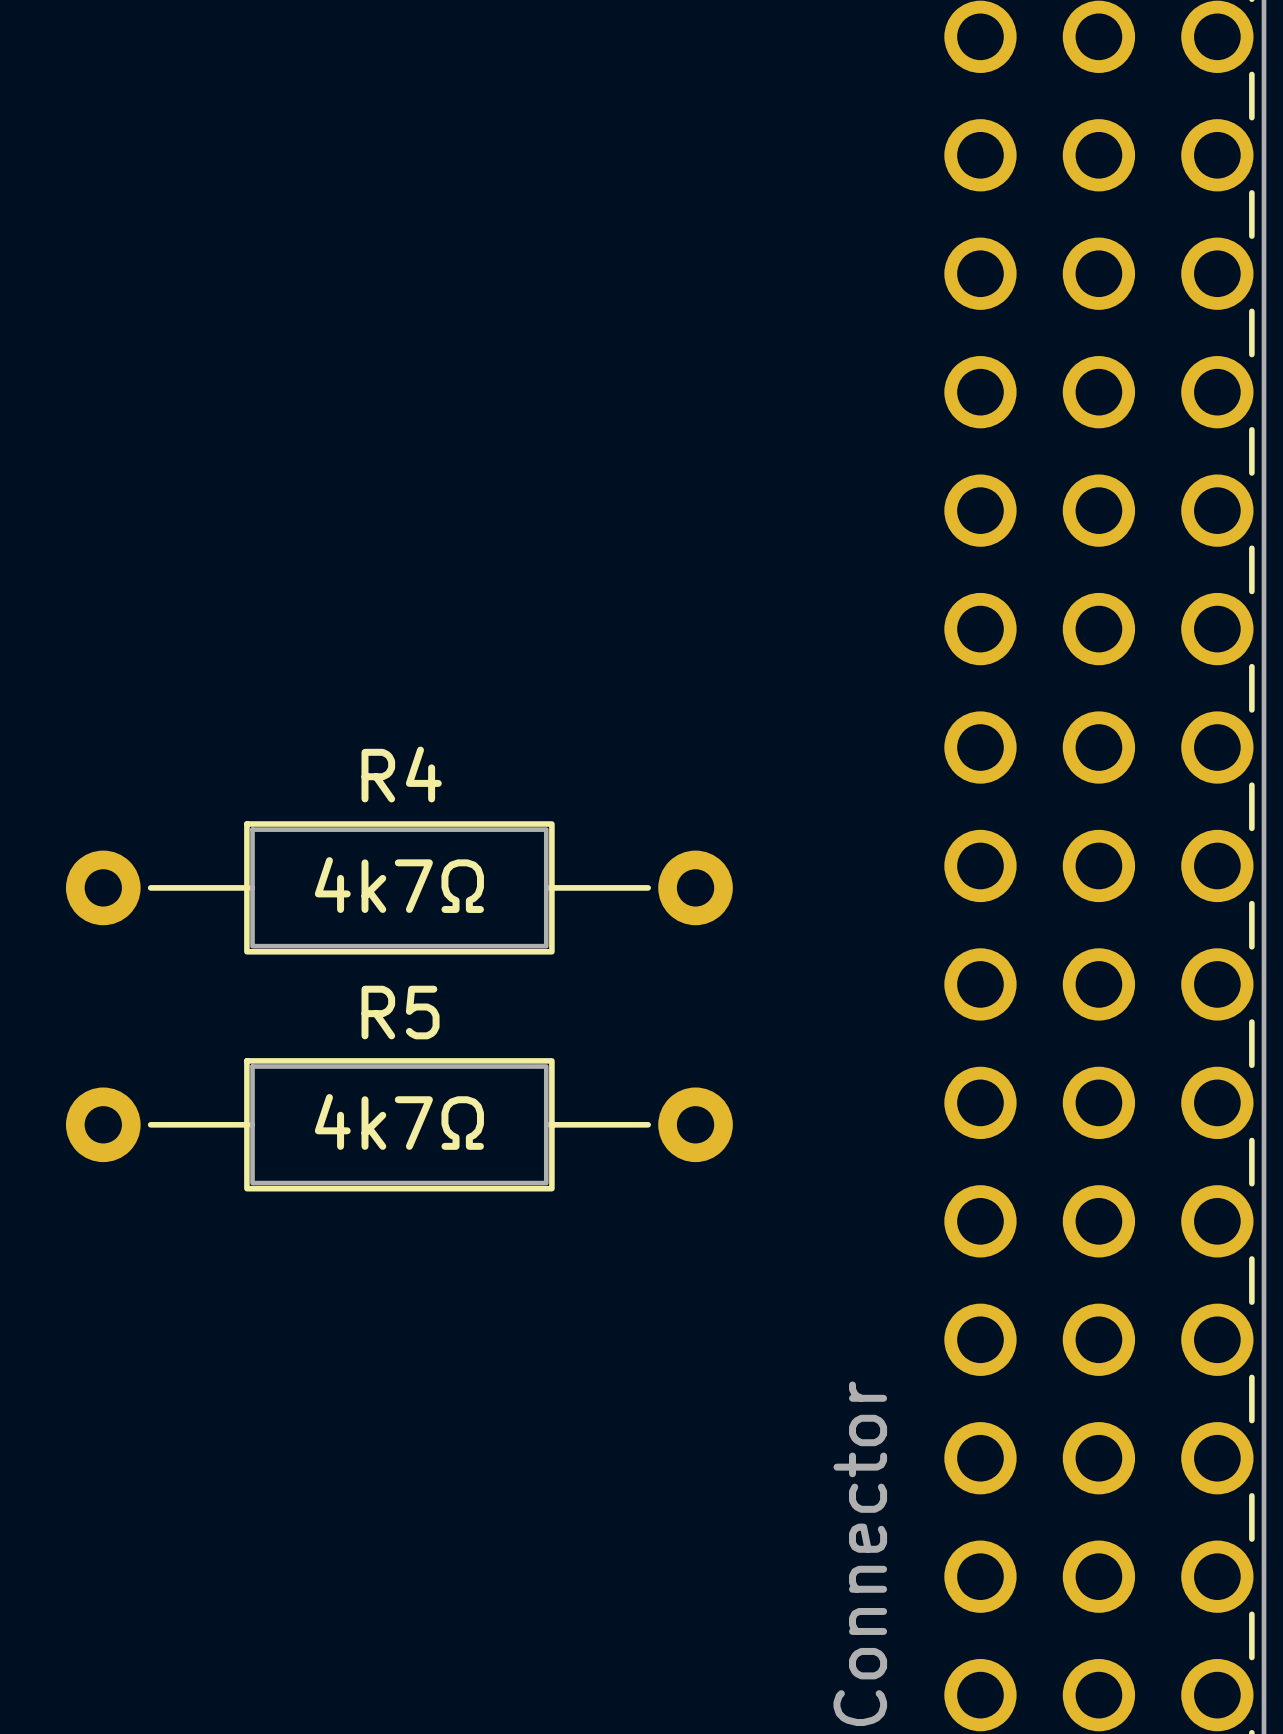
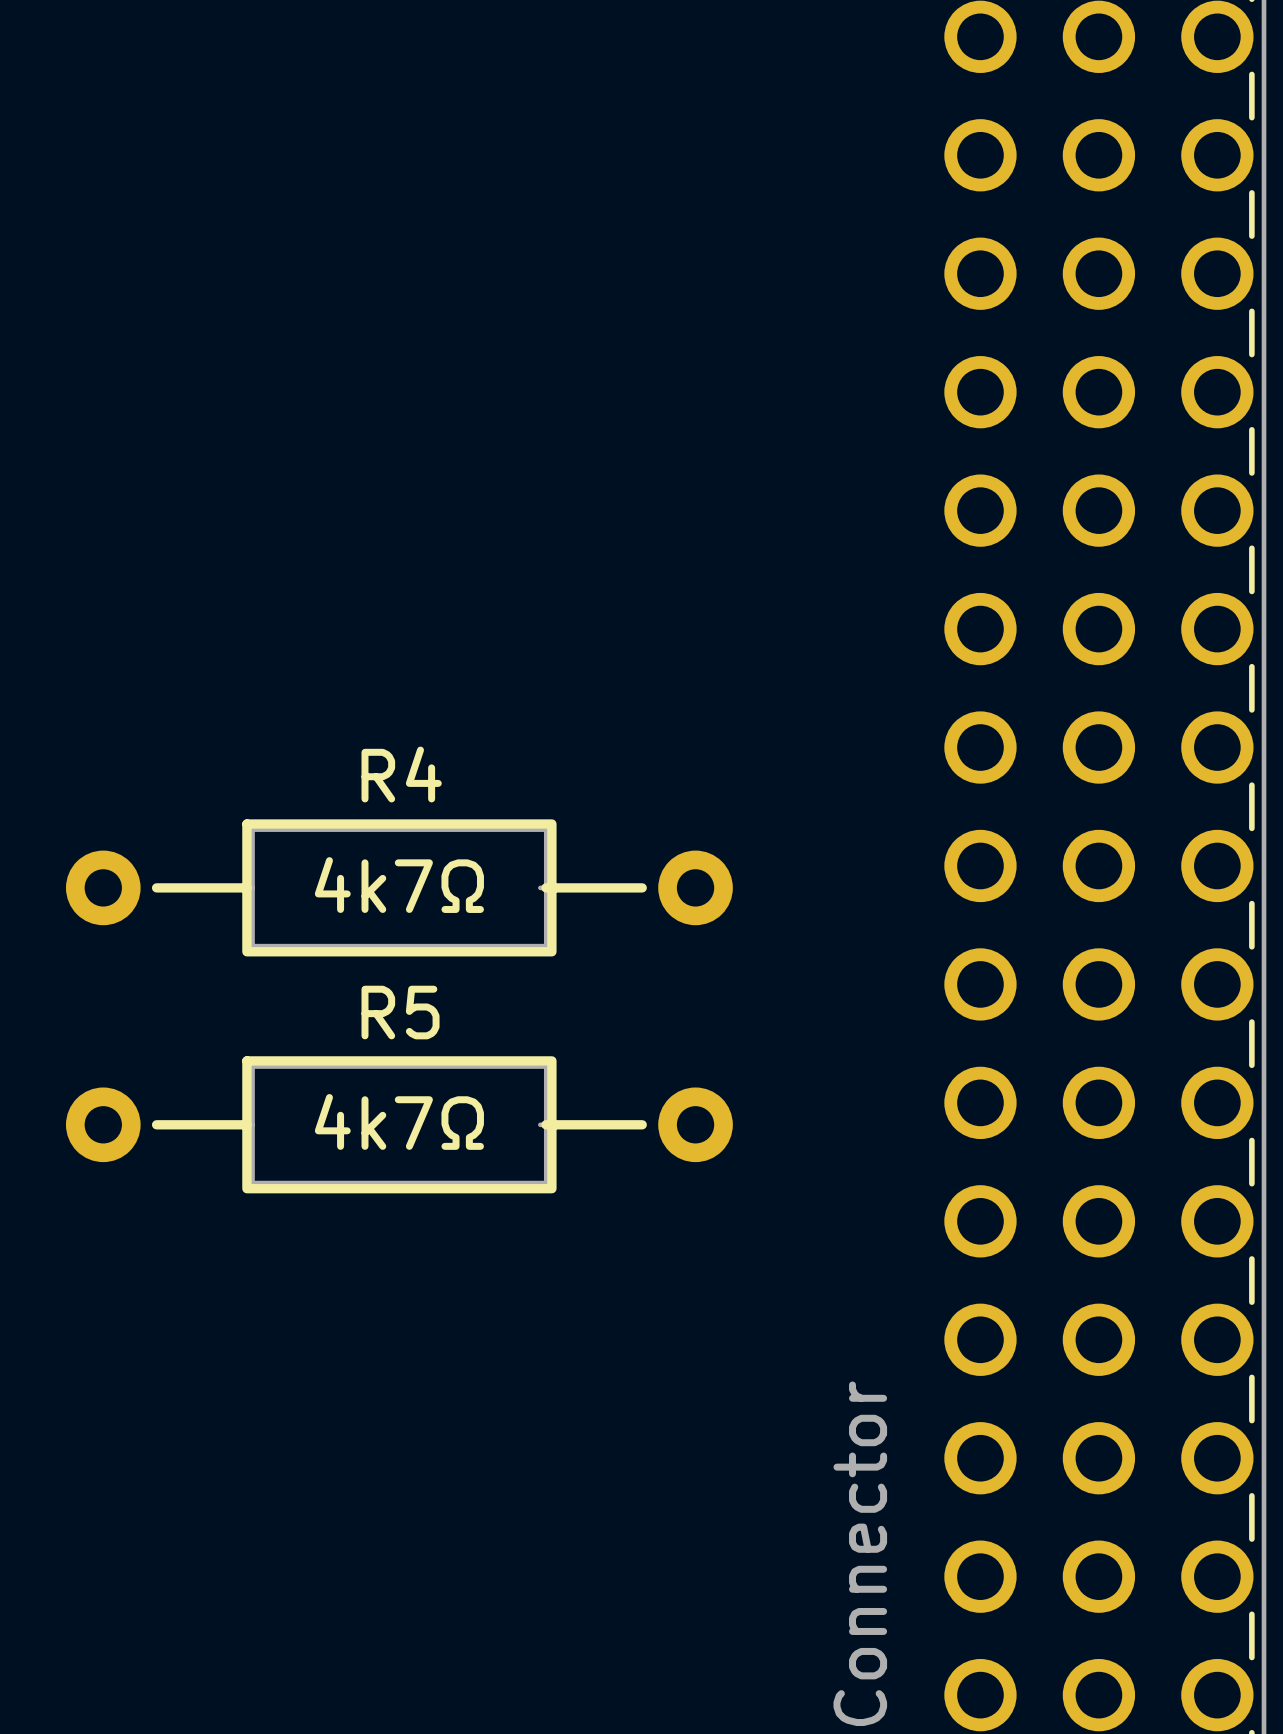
R4 footprint: [65, 821, 733, 955] -> [65, 819, 733, 957]
R5 footprint: [65, 1058, 733, 1192] -> [65, 1056, 733, 1194]

